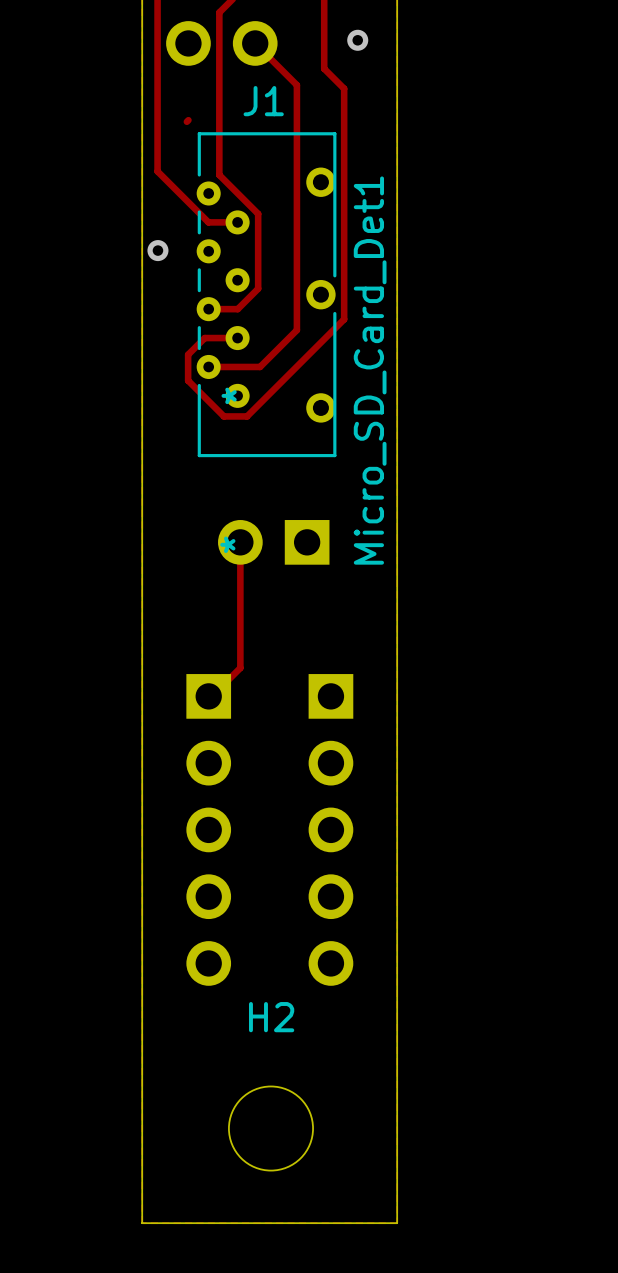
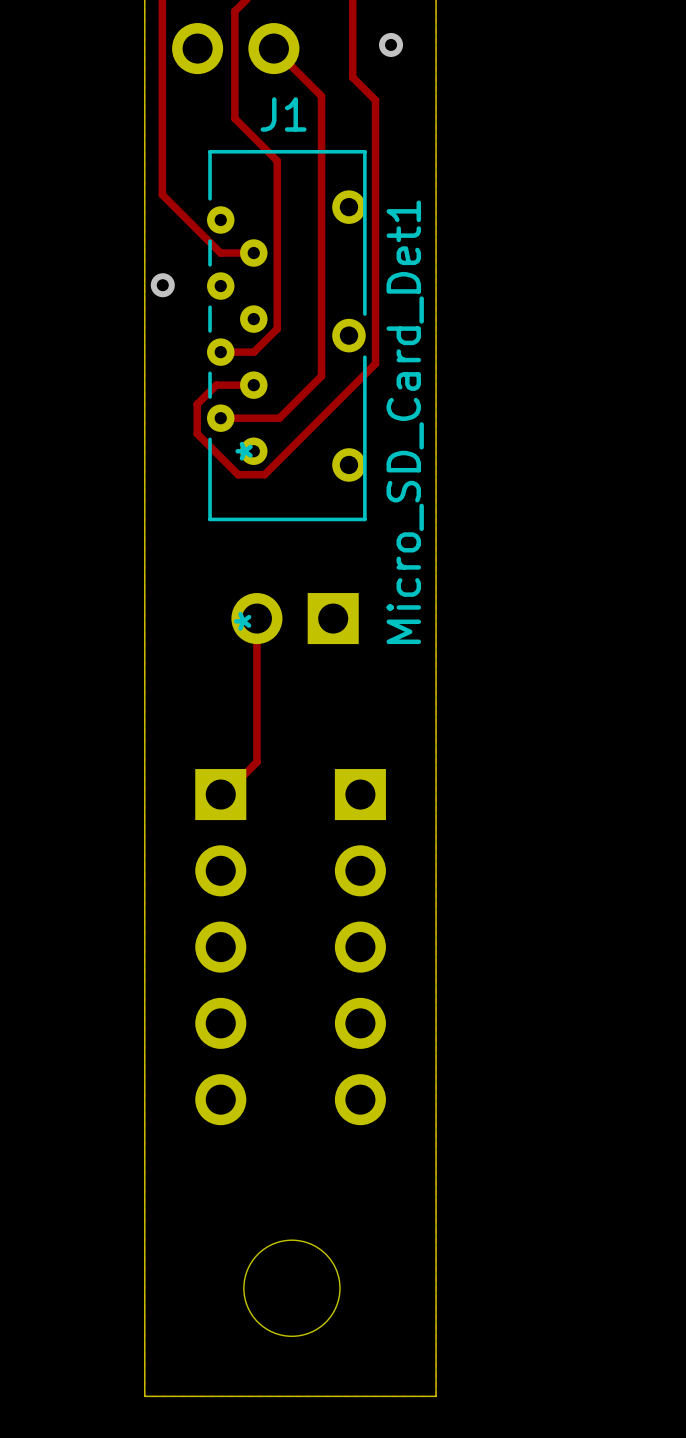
track: (221, 10) (219, 12) (219, 175) (258, 213) -> (234, 11) (234, 118) (277, 160) (277, 243)
track: (188, 120) (186, 121) -> none
H2 name: H2 (271, 1017) -> none

